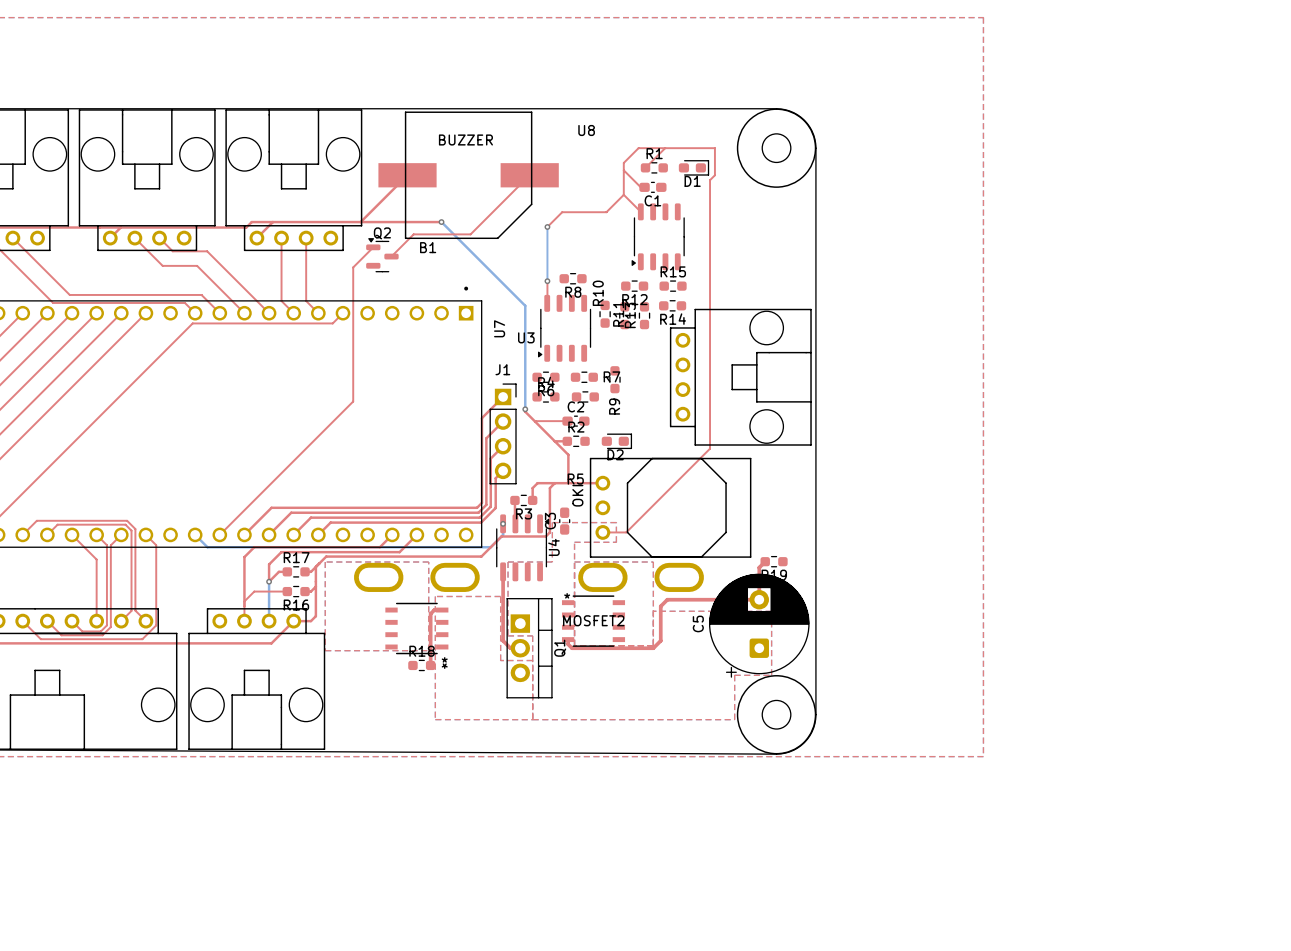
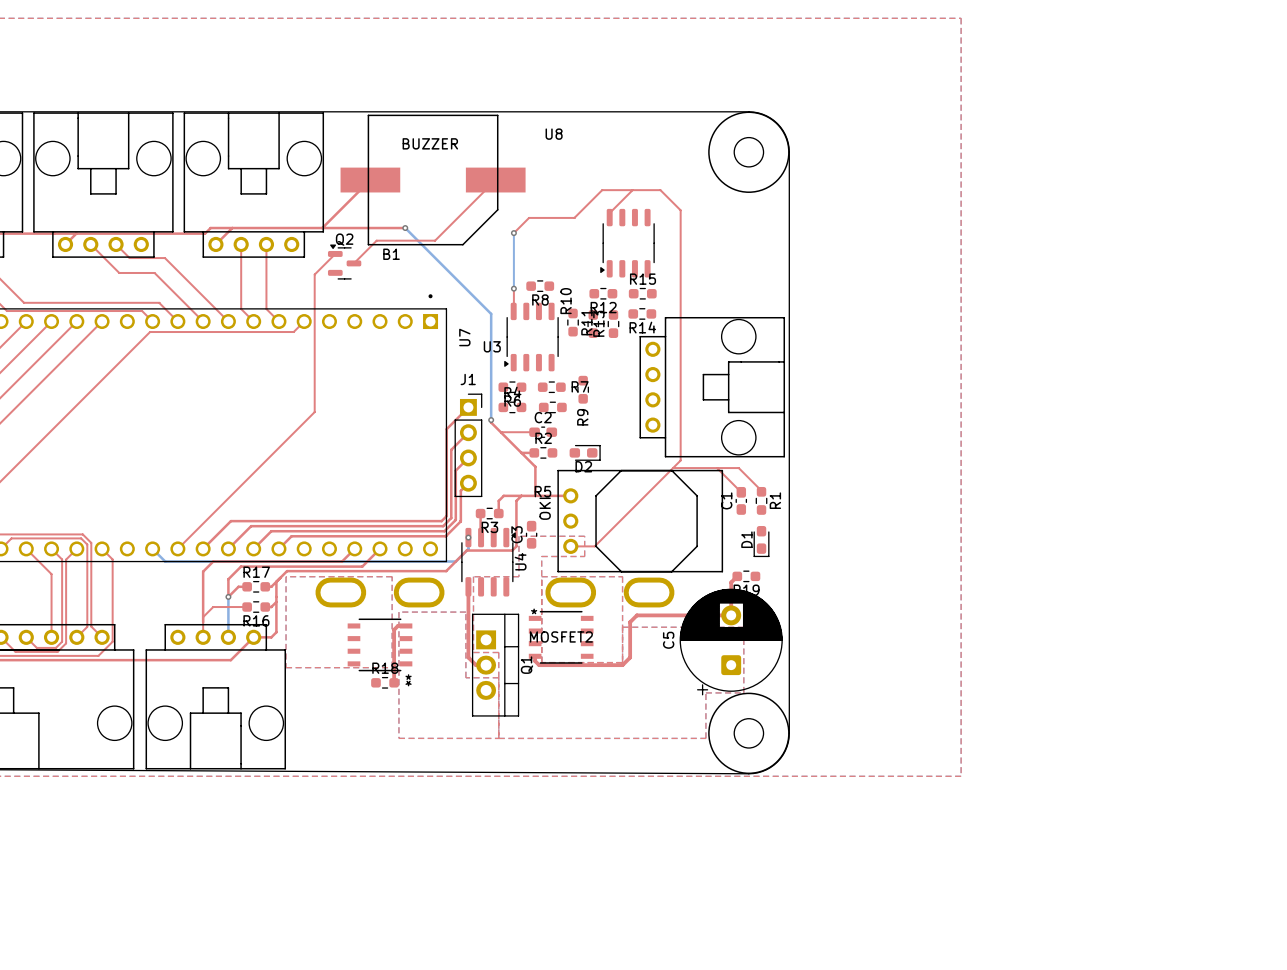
top track: (665, 148) (645, 167) -> none
R1 rotation: 0° (654, 167) -> 90° clockwise (761, 500)
R1 position: (654, 167) -> (761, 500)
D1 rotation: 0° (693, 167) -> 90° clockwise (761, 541)
D1 position: (693, 167) -> (761, 541)
top track: (623, 170) (640, 187) (644, 187) -> none
top track: none -> (632, 190) (609, 213) (609, 217)
C1 rotation: 0° (652, 187) -> 90° clockwise (741, 500)
C1 position: (652, 187) -> (741, 500)
top track: (710, 204) (710, 180) (714, 175) (714, 148) (638, 148) (623, 162) (623, 194) (640, 211) -> (680, 210) (660, 190) (602, 190) (592, 200)
top track: none -> (673, 468) (738, 468) (761, 491)
top track: none -> (717, 468) (741, 492)

